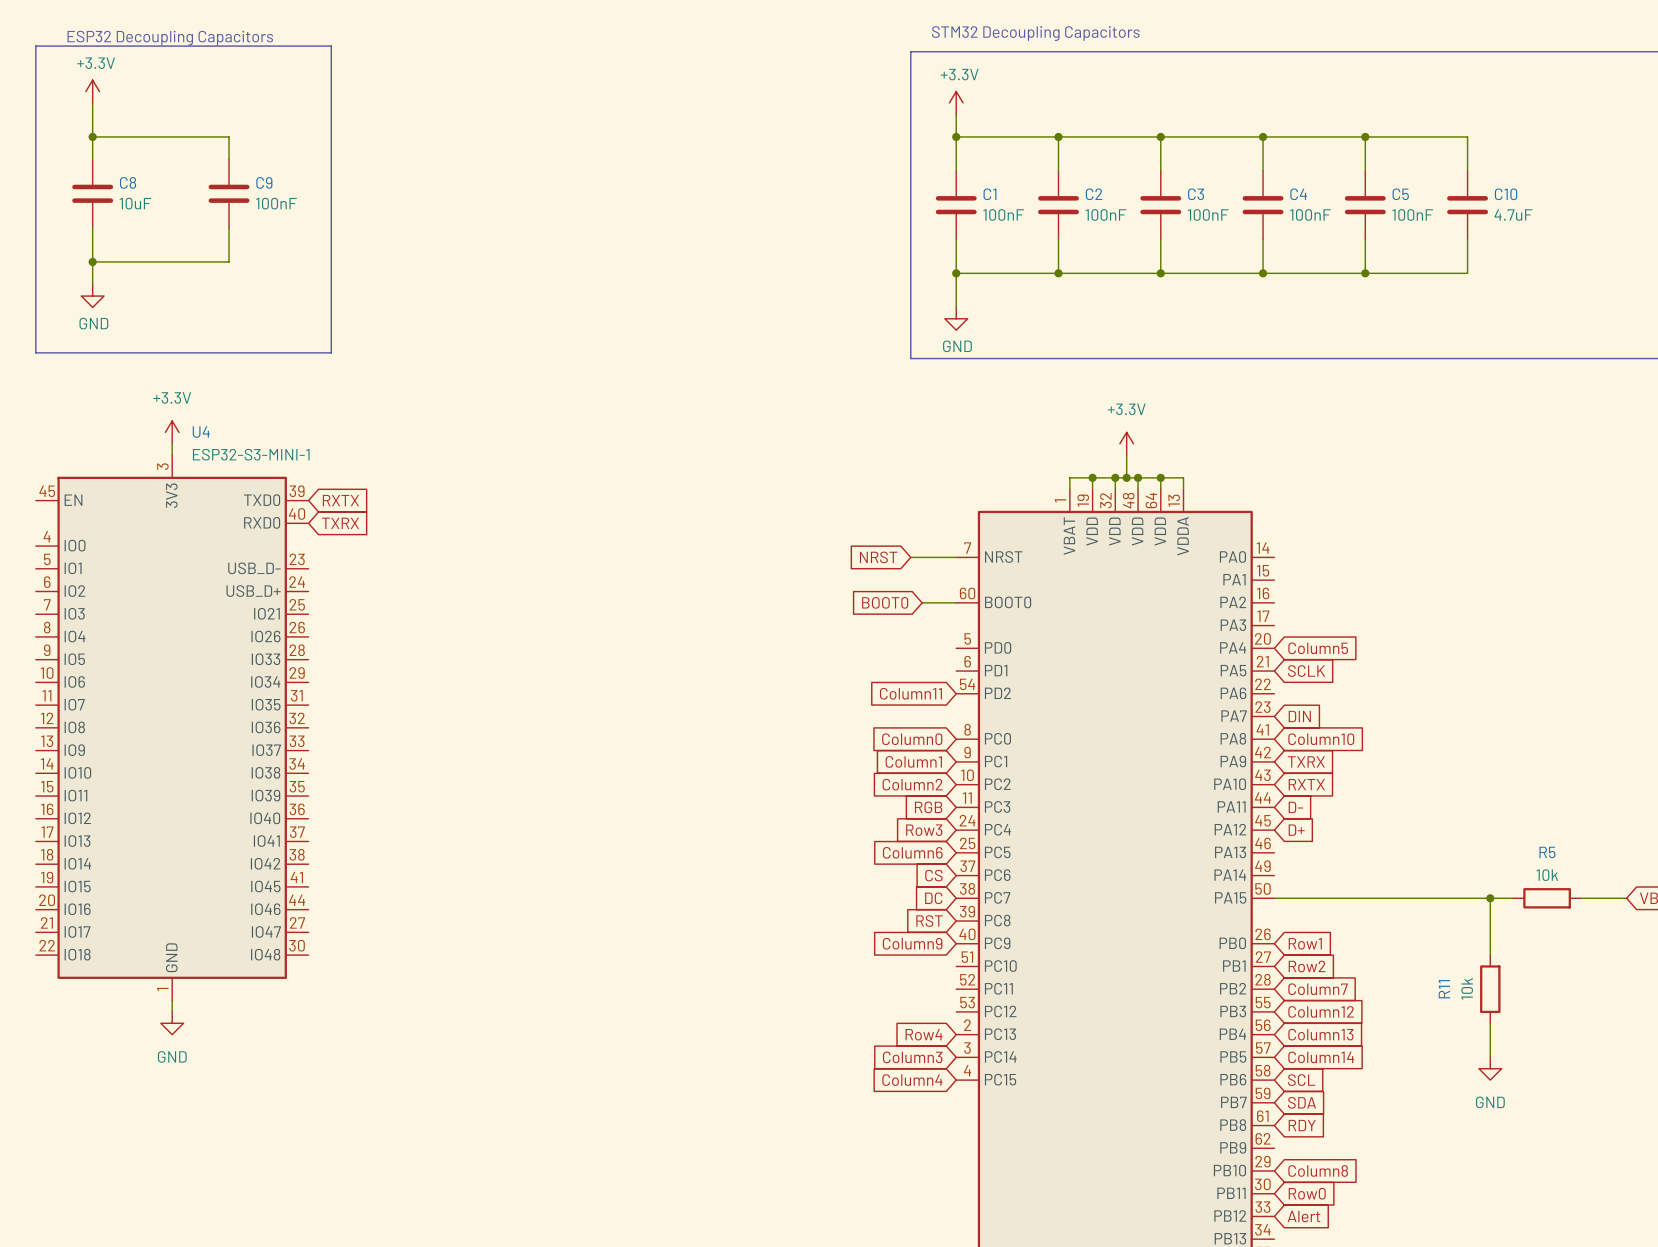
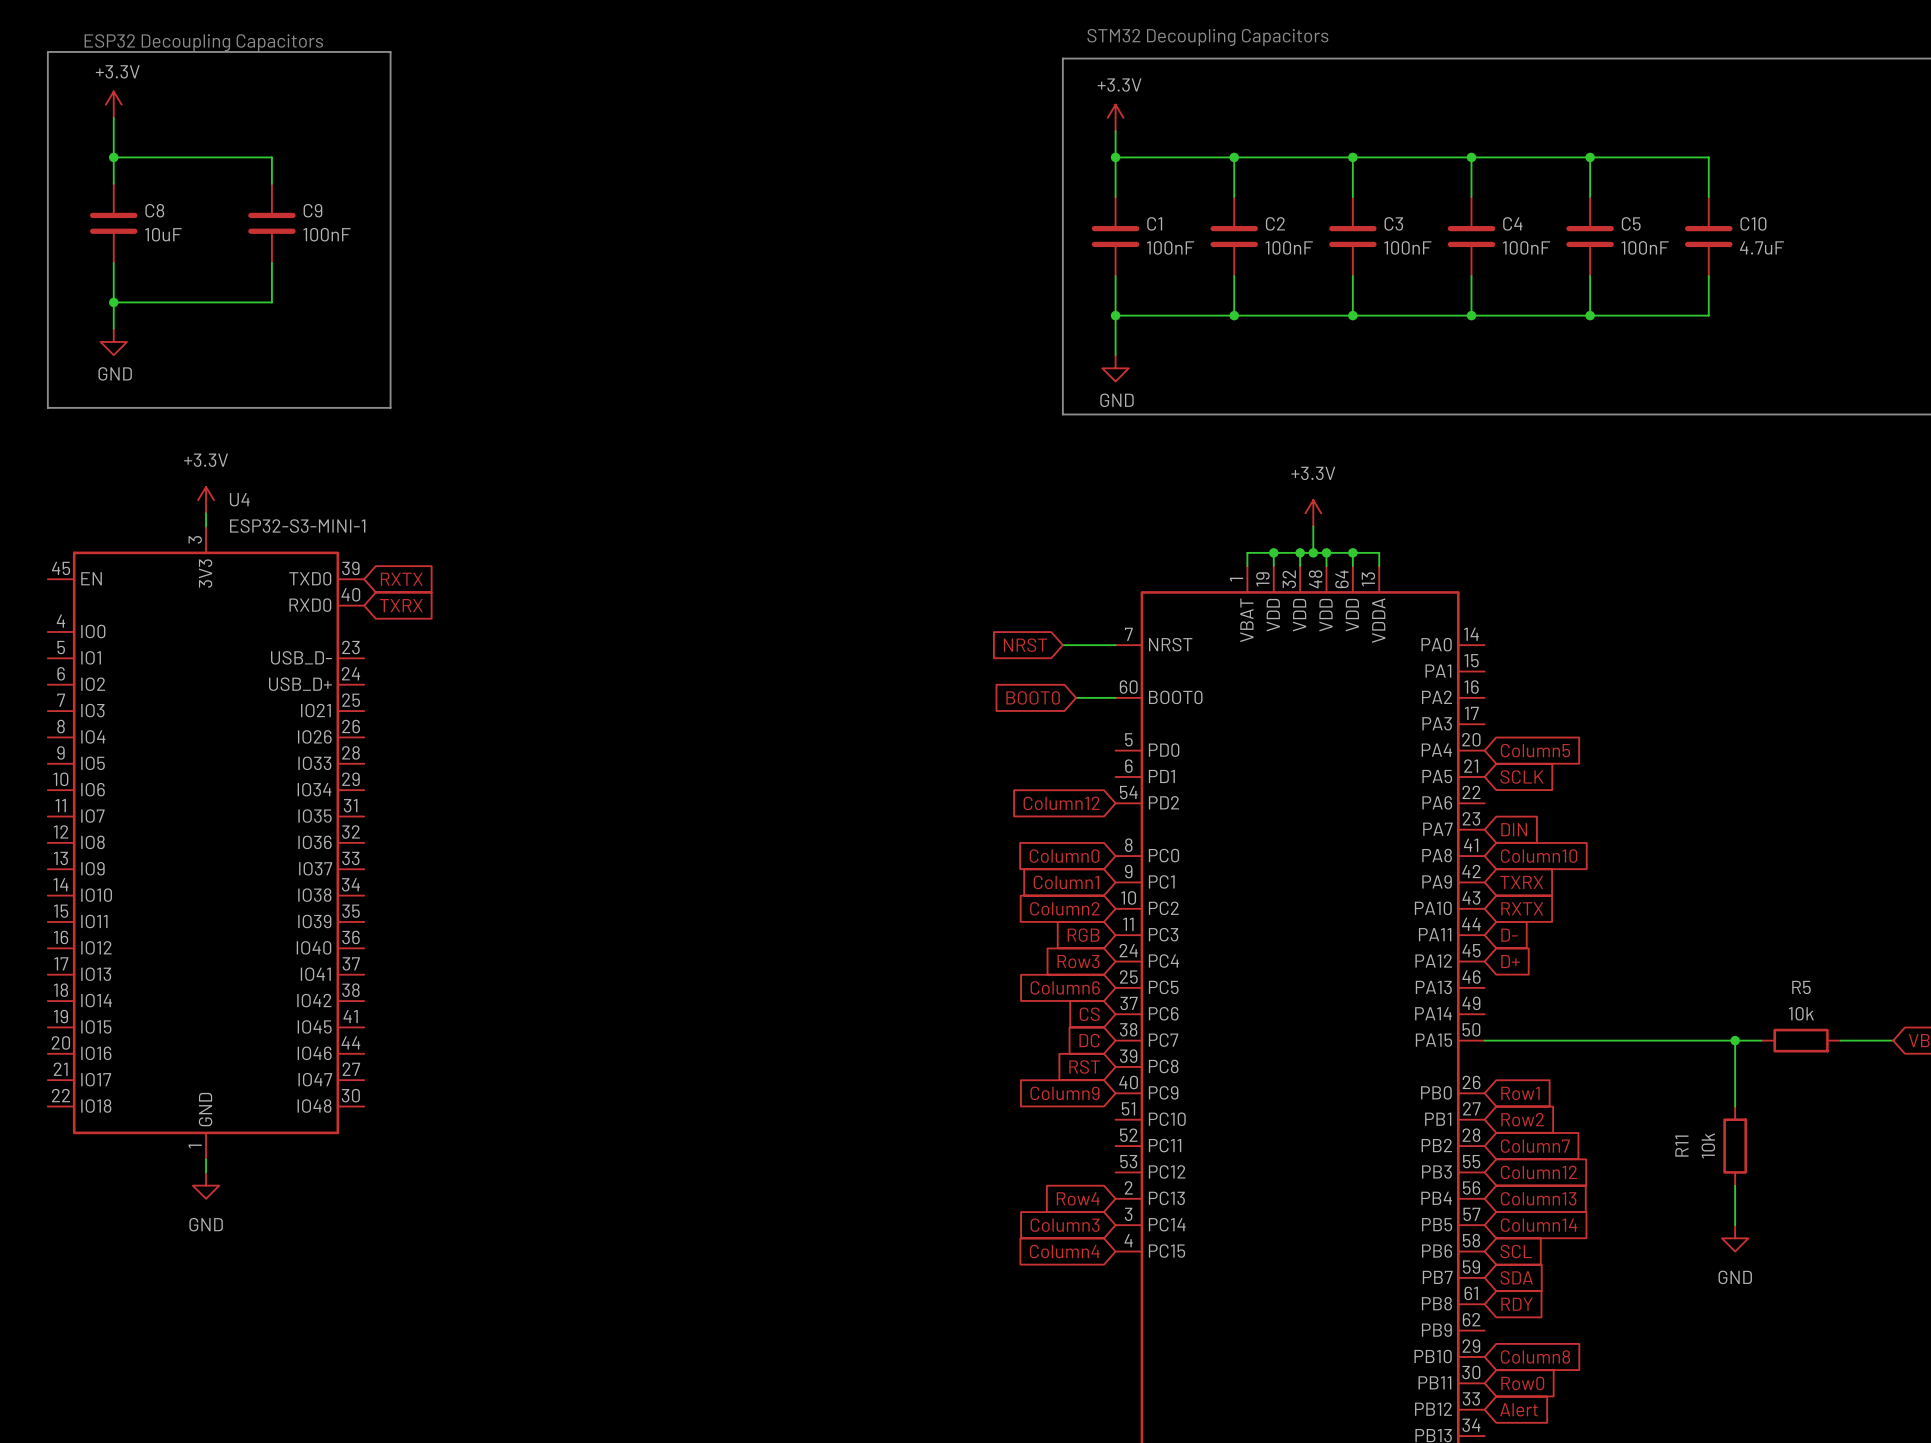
global label: Column11 (910, 693) -> Column12 (1061, 803)

